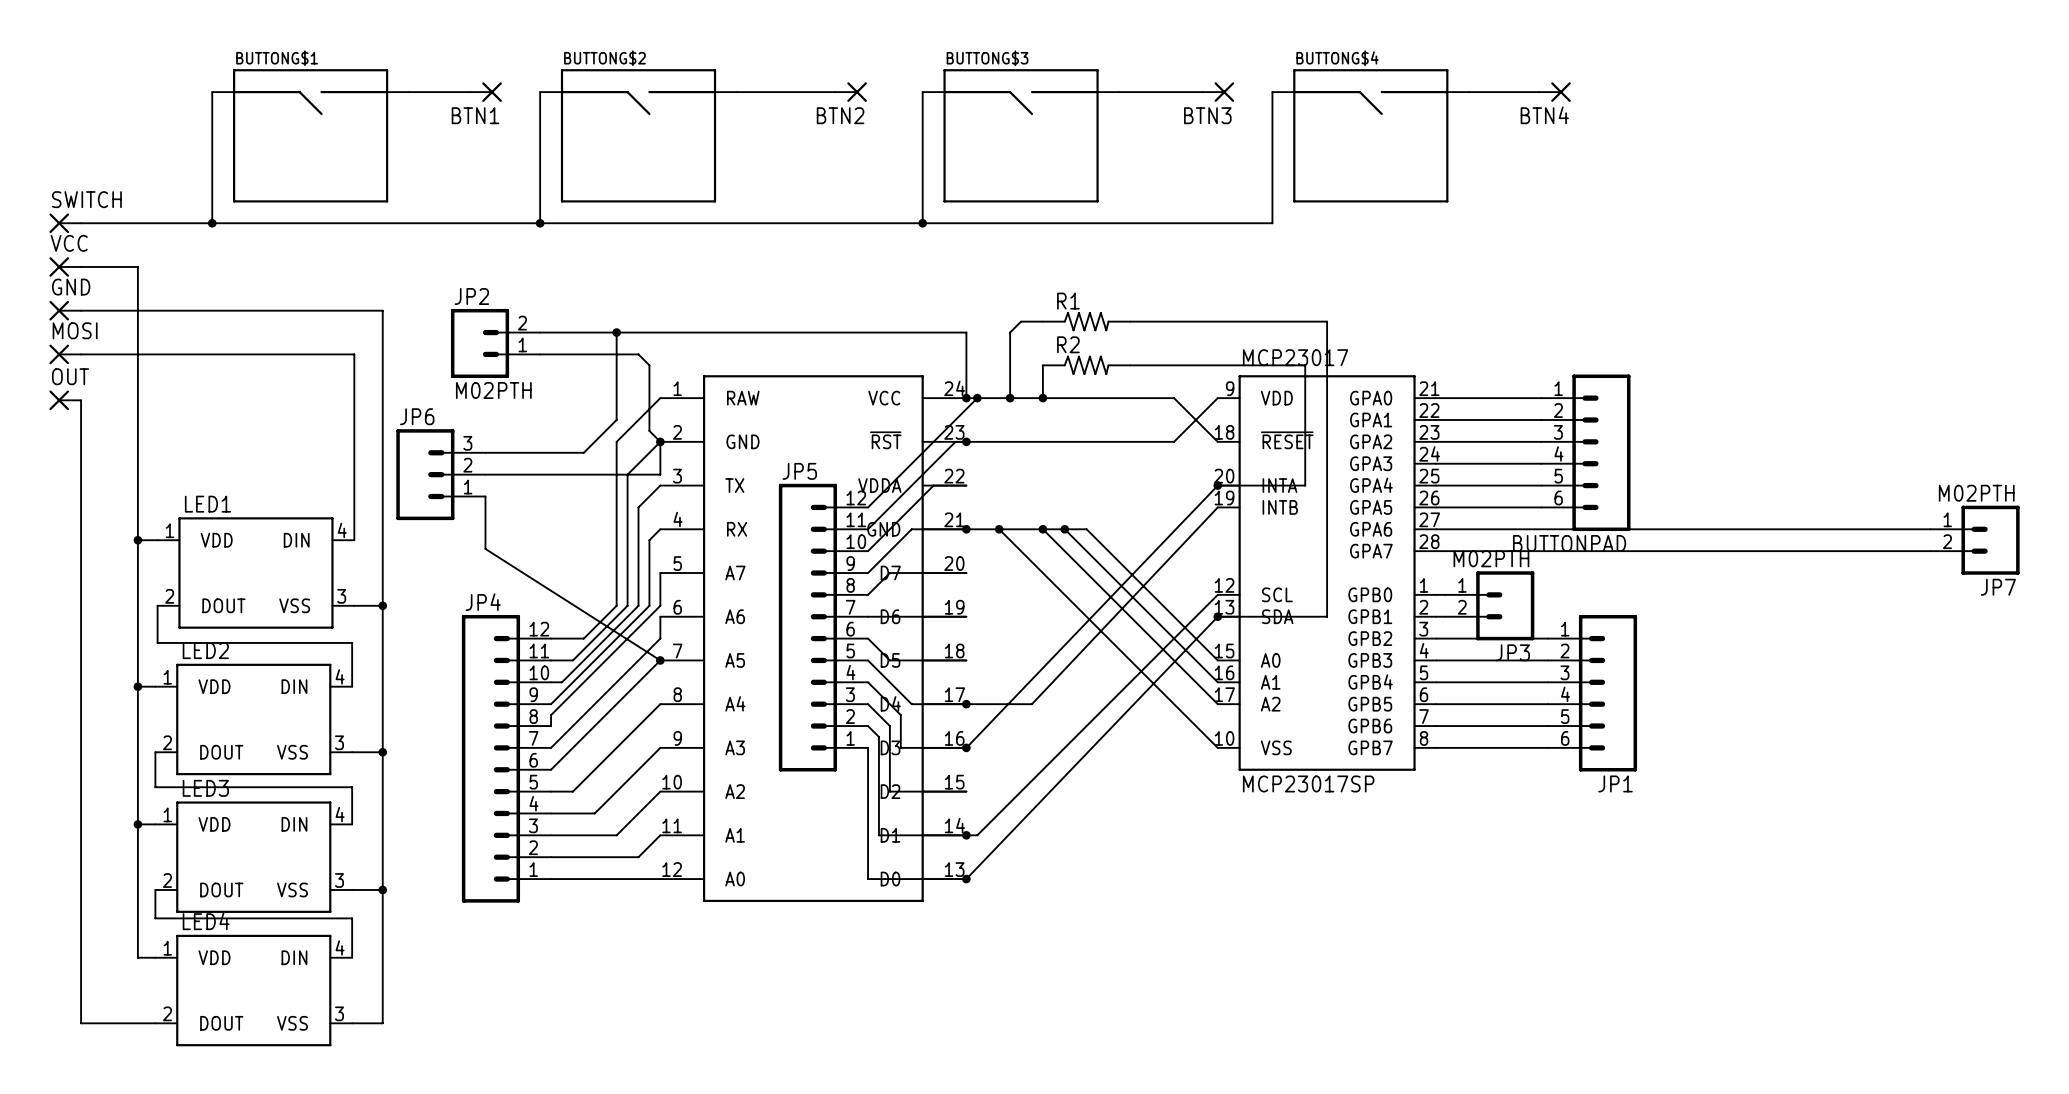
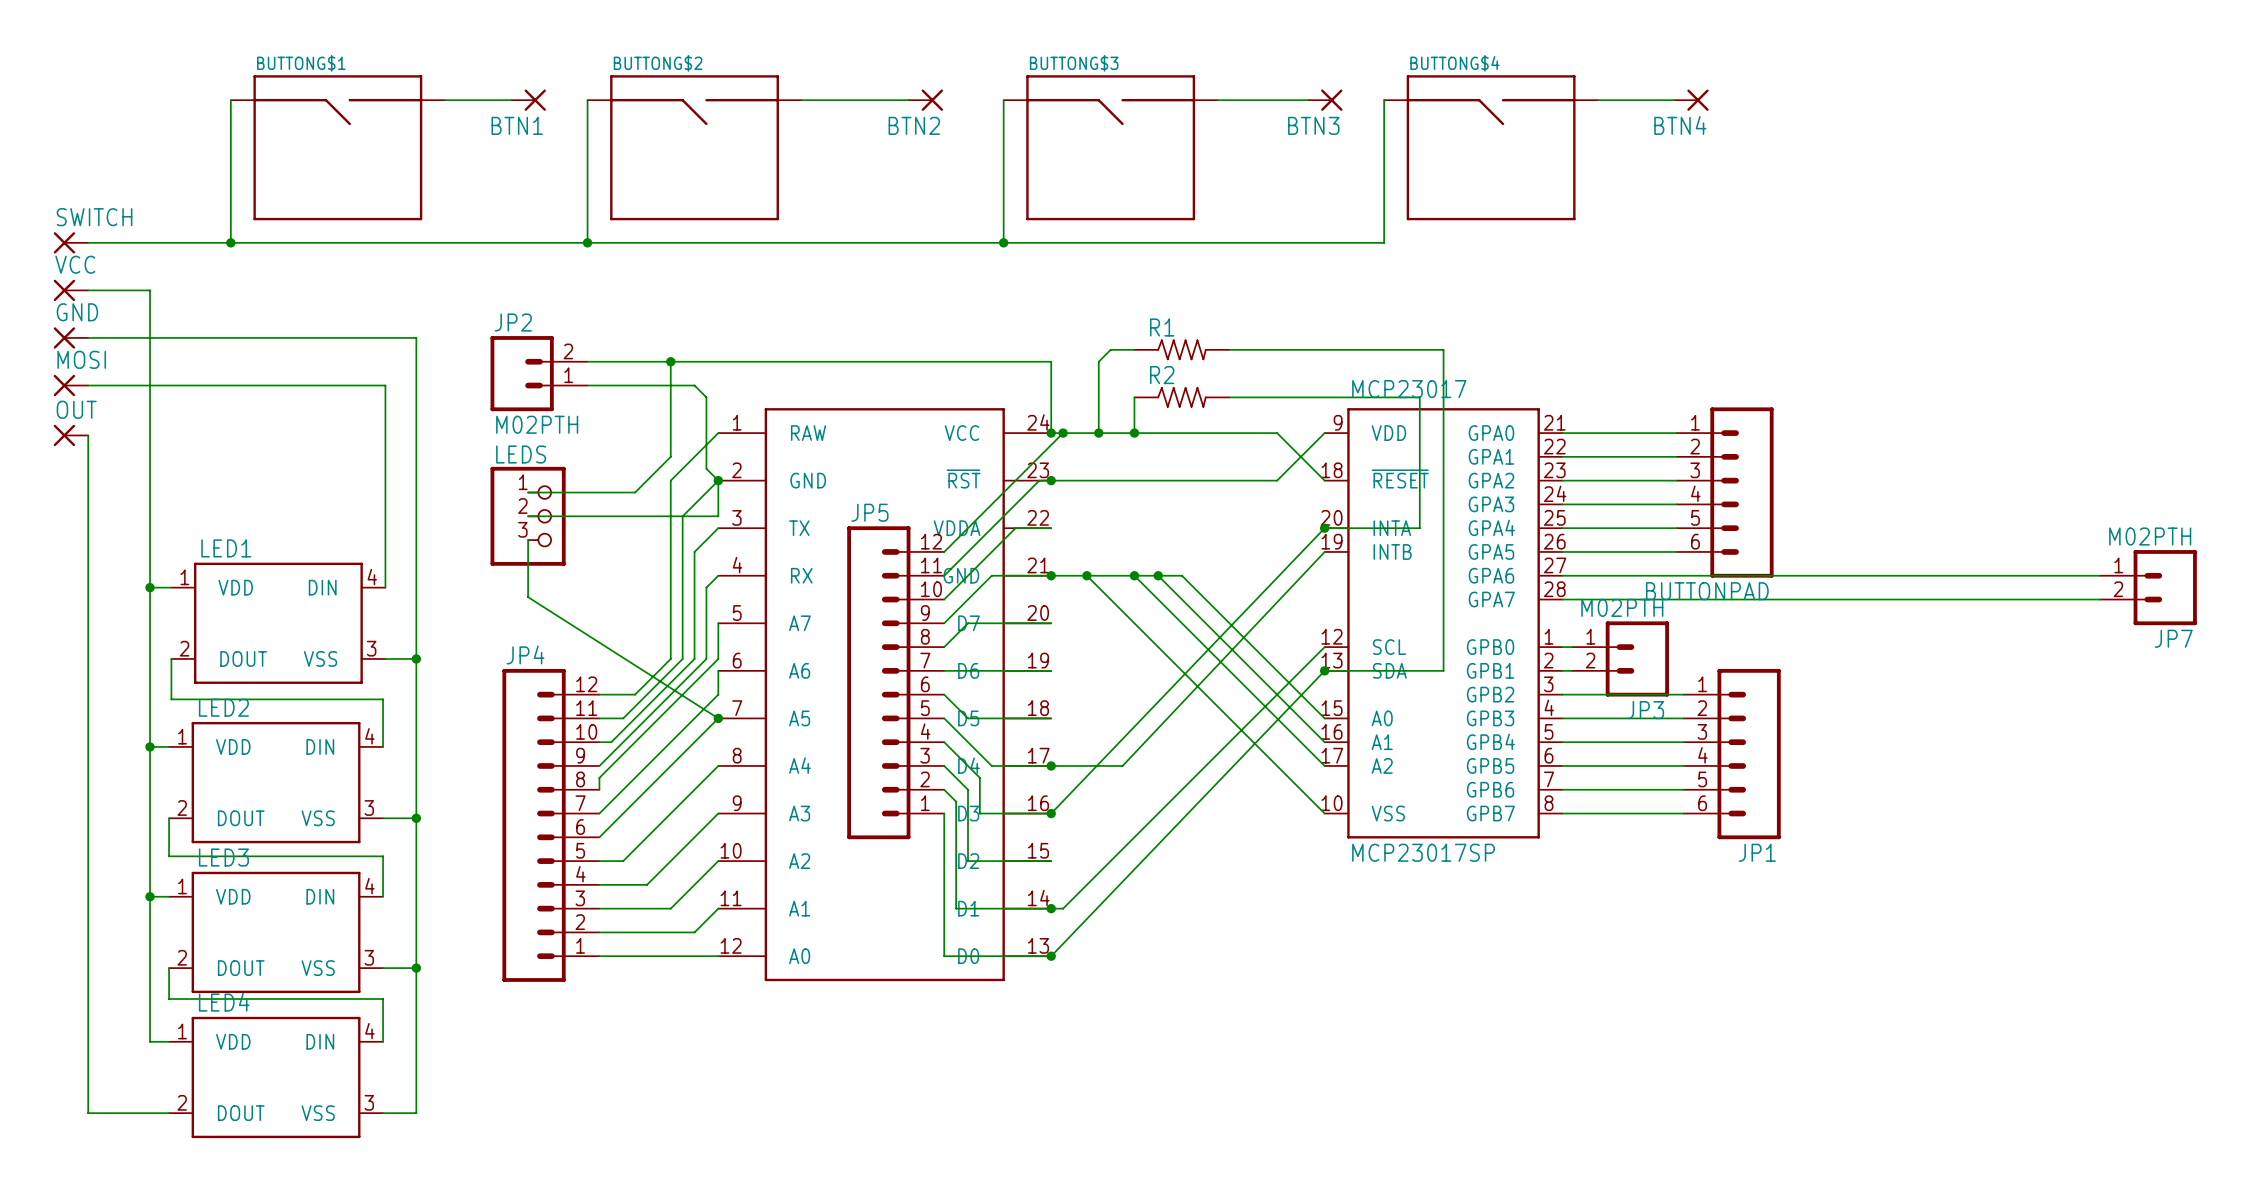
JP6: (440, 474) -> none
LEDS: none -> (528, 516)

